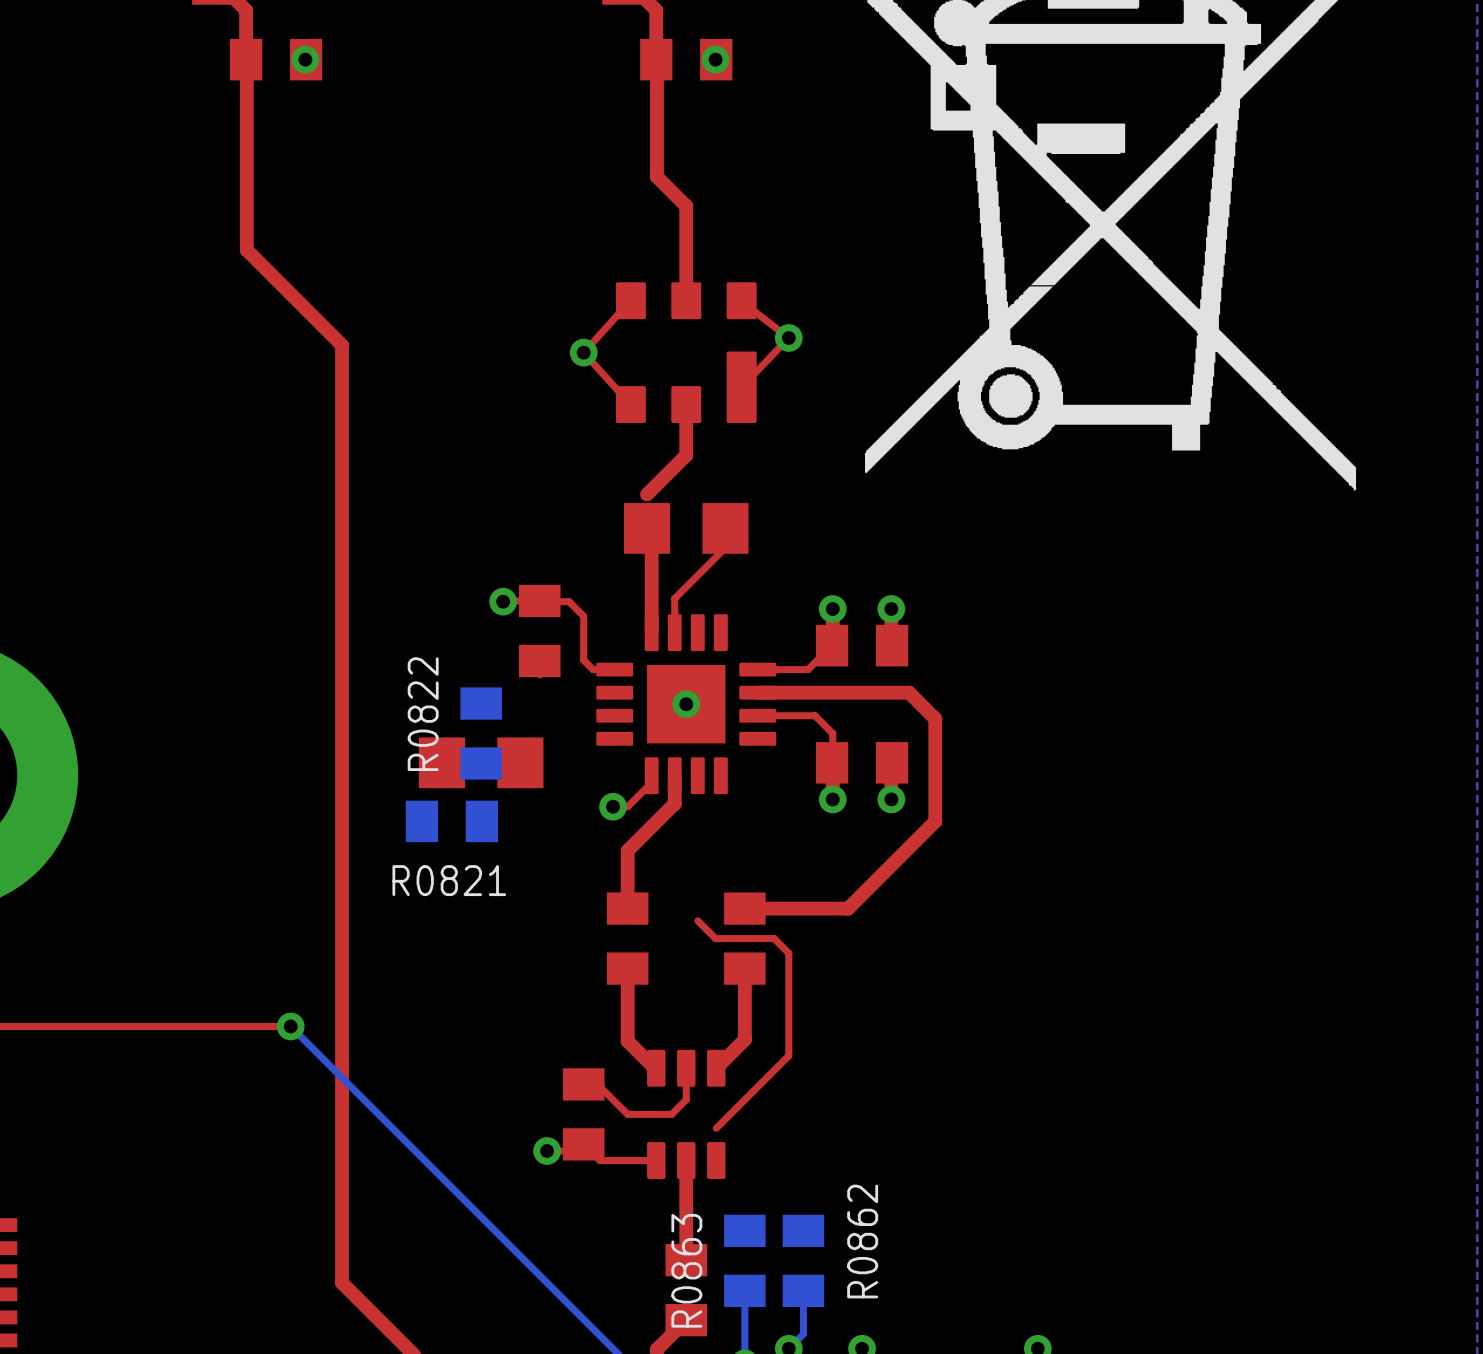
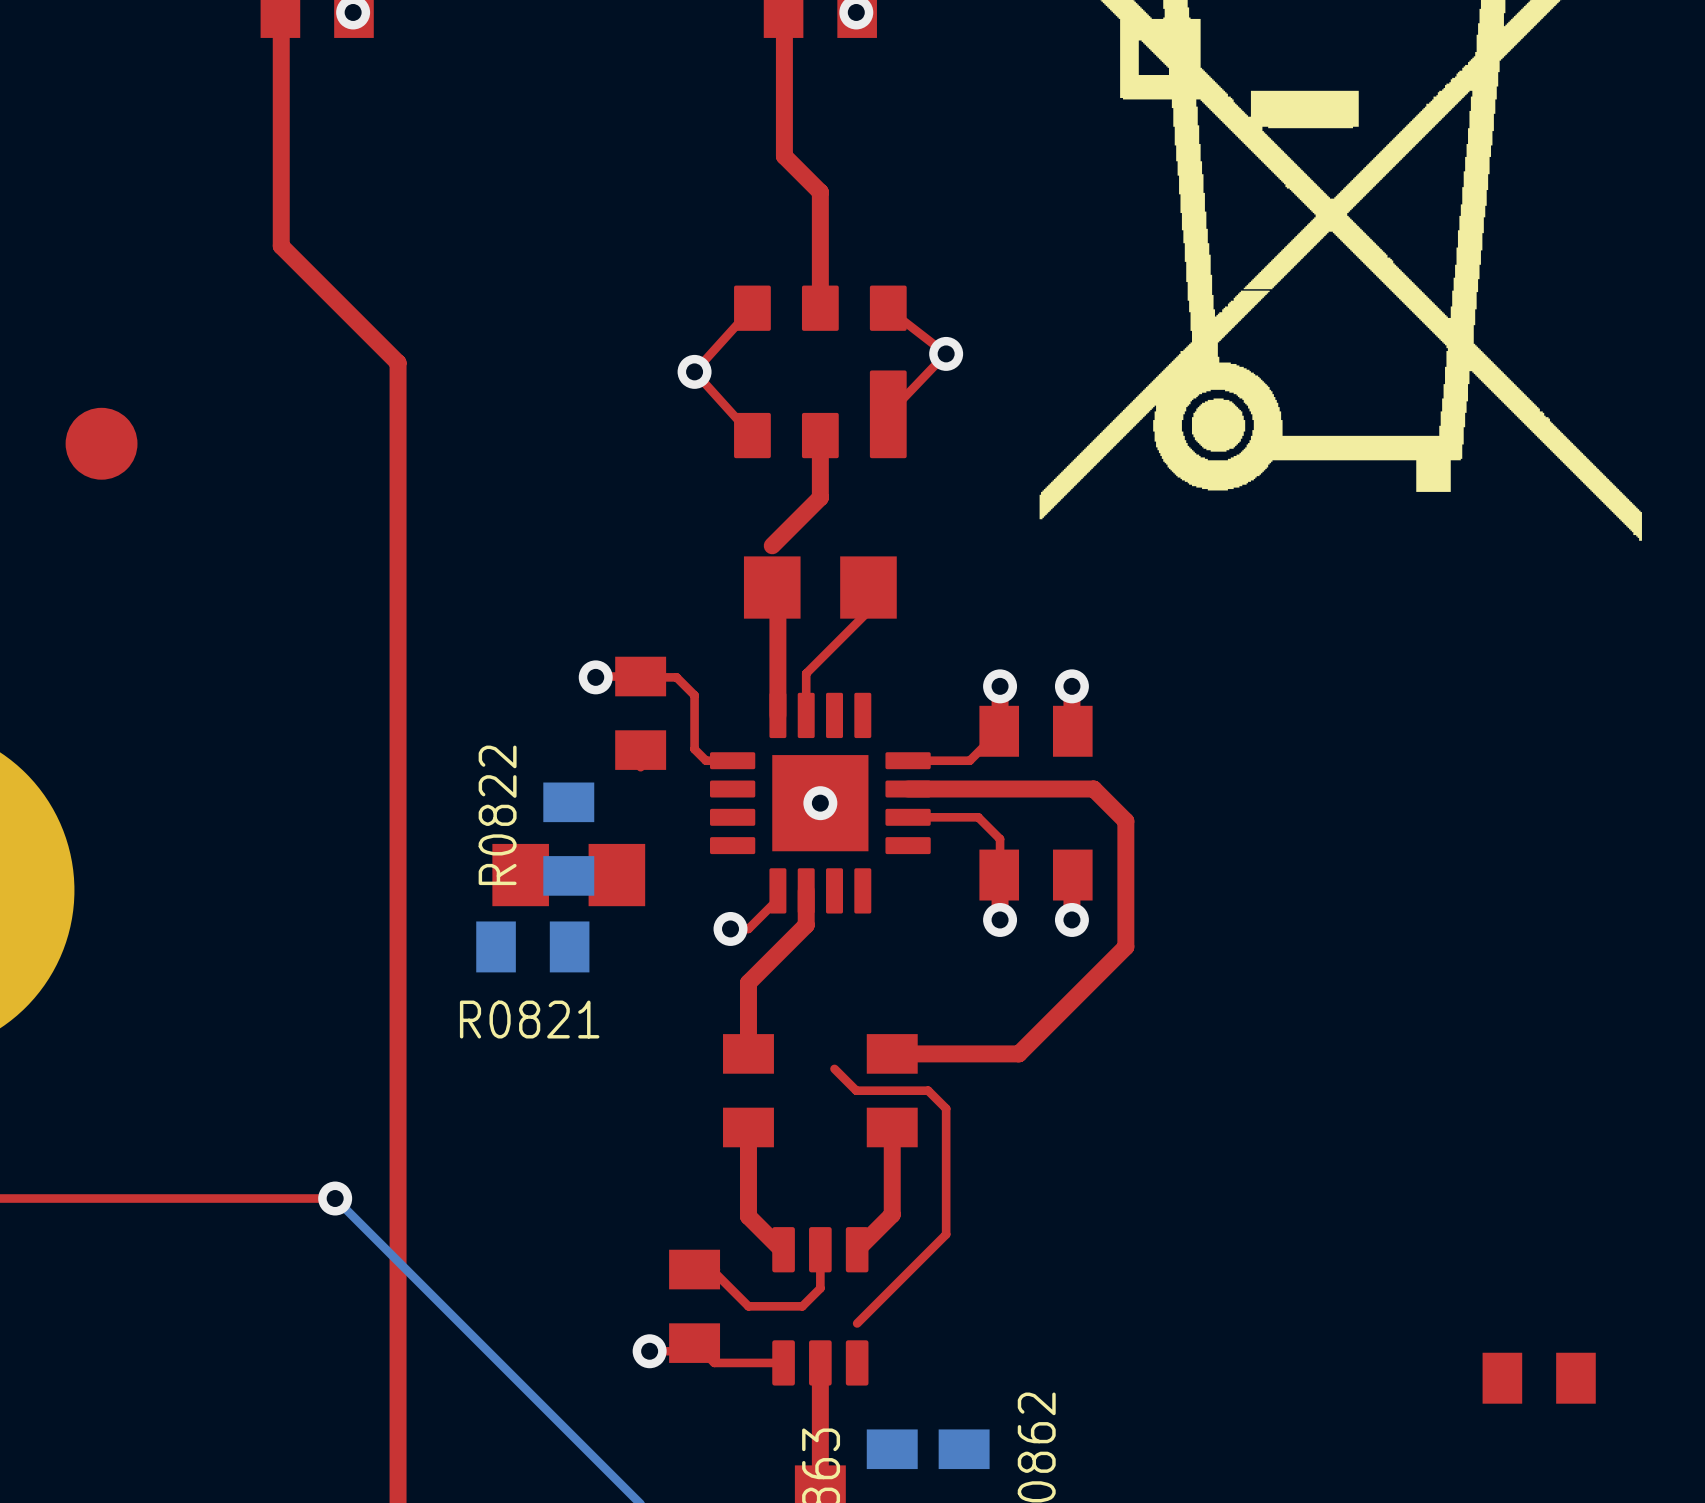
part: none -> (101, 443)
part: none -> (1539, 1378)

